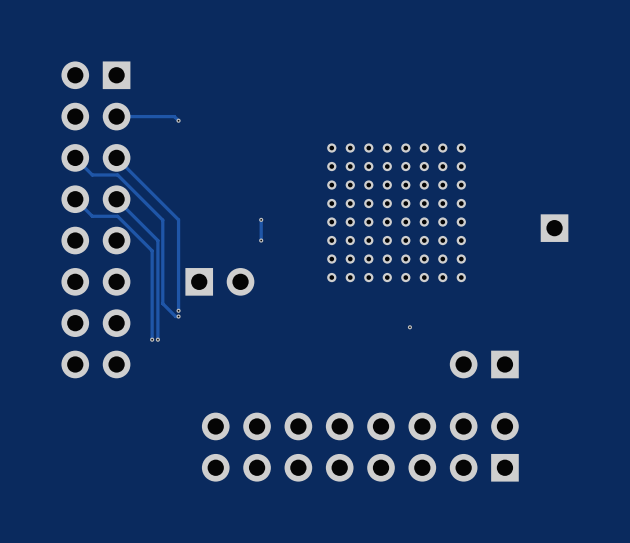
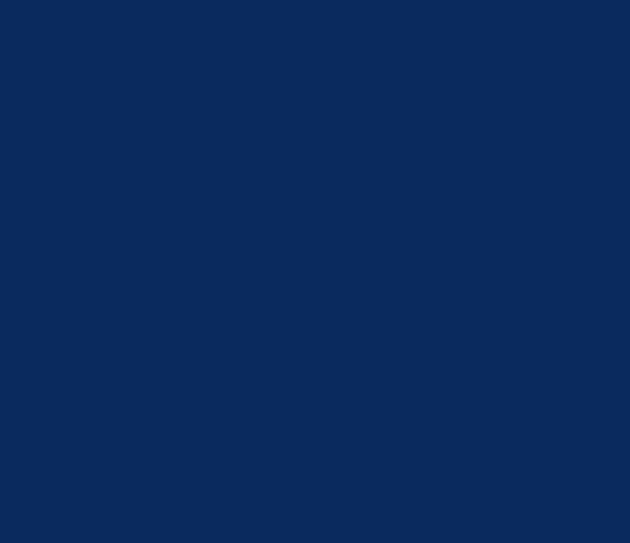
track: (116, 116) (174, 116) (178, 120) -> none
via: (178, 120) -> none
track: (75, 157) (92, 174) (117, 174) (162, 220) (162, 303) (175, 316) (178, 316) -> none
track: (116, 157) (178, 219) (178, 310) -> none
track: (75, 199) (92, 216) (117, 216) (152, 250) (152, 339) -> none
track: (116, 199) (157, 240) (157, 339) -> none
part: (396, 212) -> none
part: (95, 219) -> none
track: (261, 219) (261, 240) -> none
via: (261, 219) -> none
part: (554, 228) -> none
via: (261, 240) -> none
part: (219, 281) -> none
via: (178, 310) -> none
via: (178, 316) -> none
via: (409, 327) -> none
via: (152, 339) -> none
via: (157, 339) -> none
part: (484, 364) -> none
part: (360, 447) -> none

